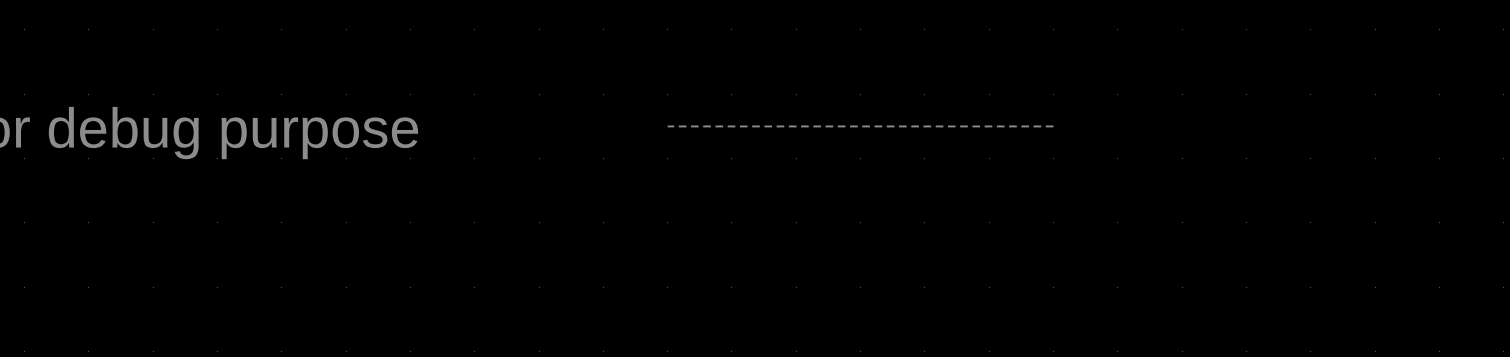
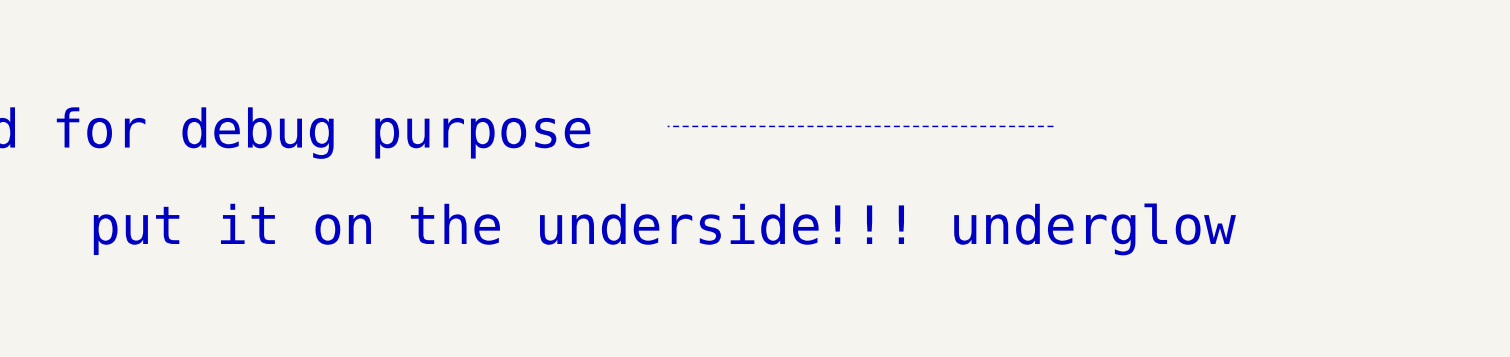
text: none -> put it on the underside!!! underglow (664, 229)

